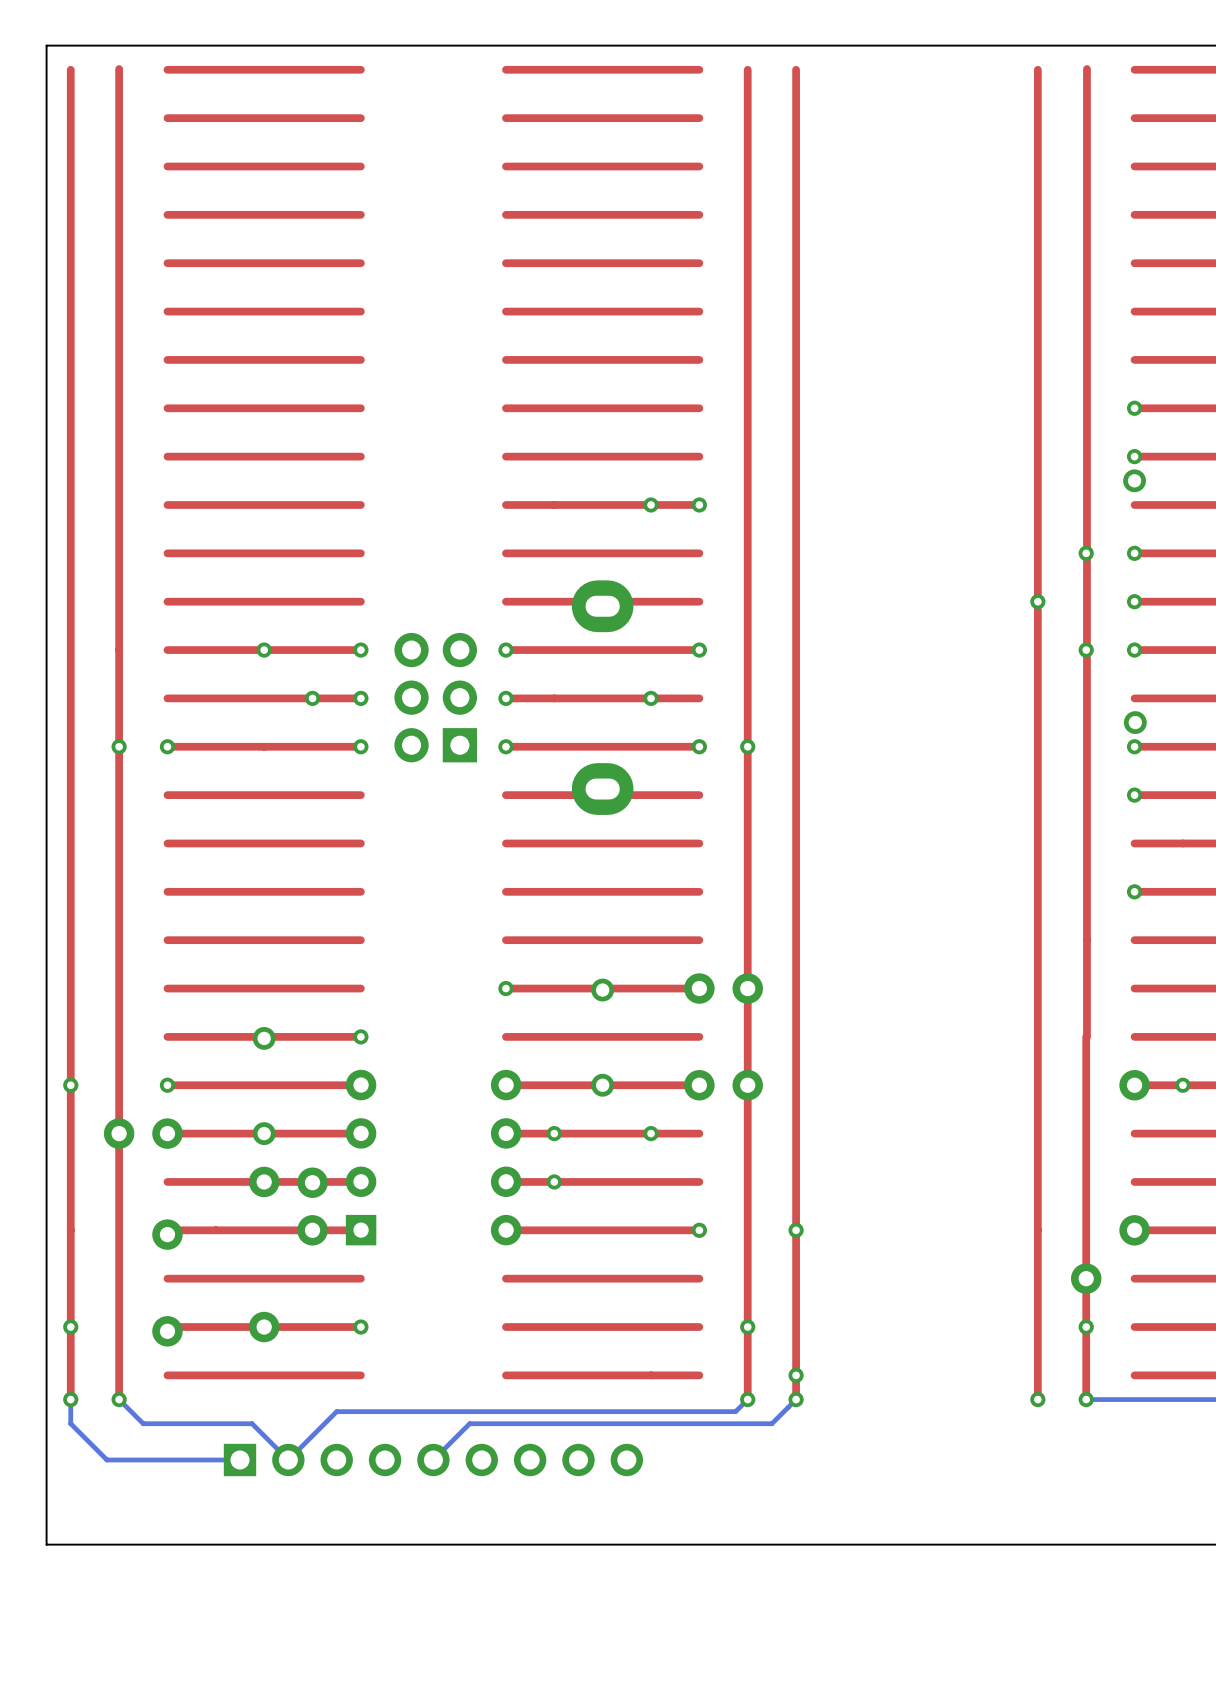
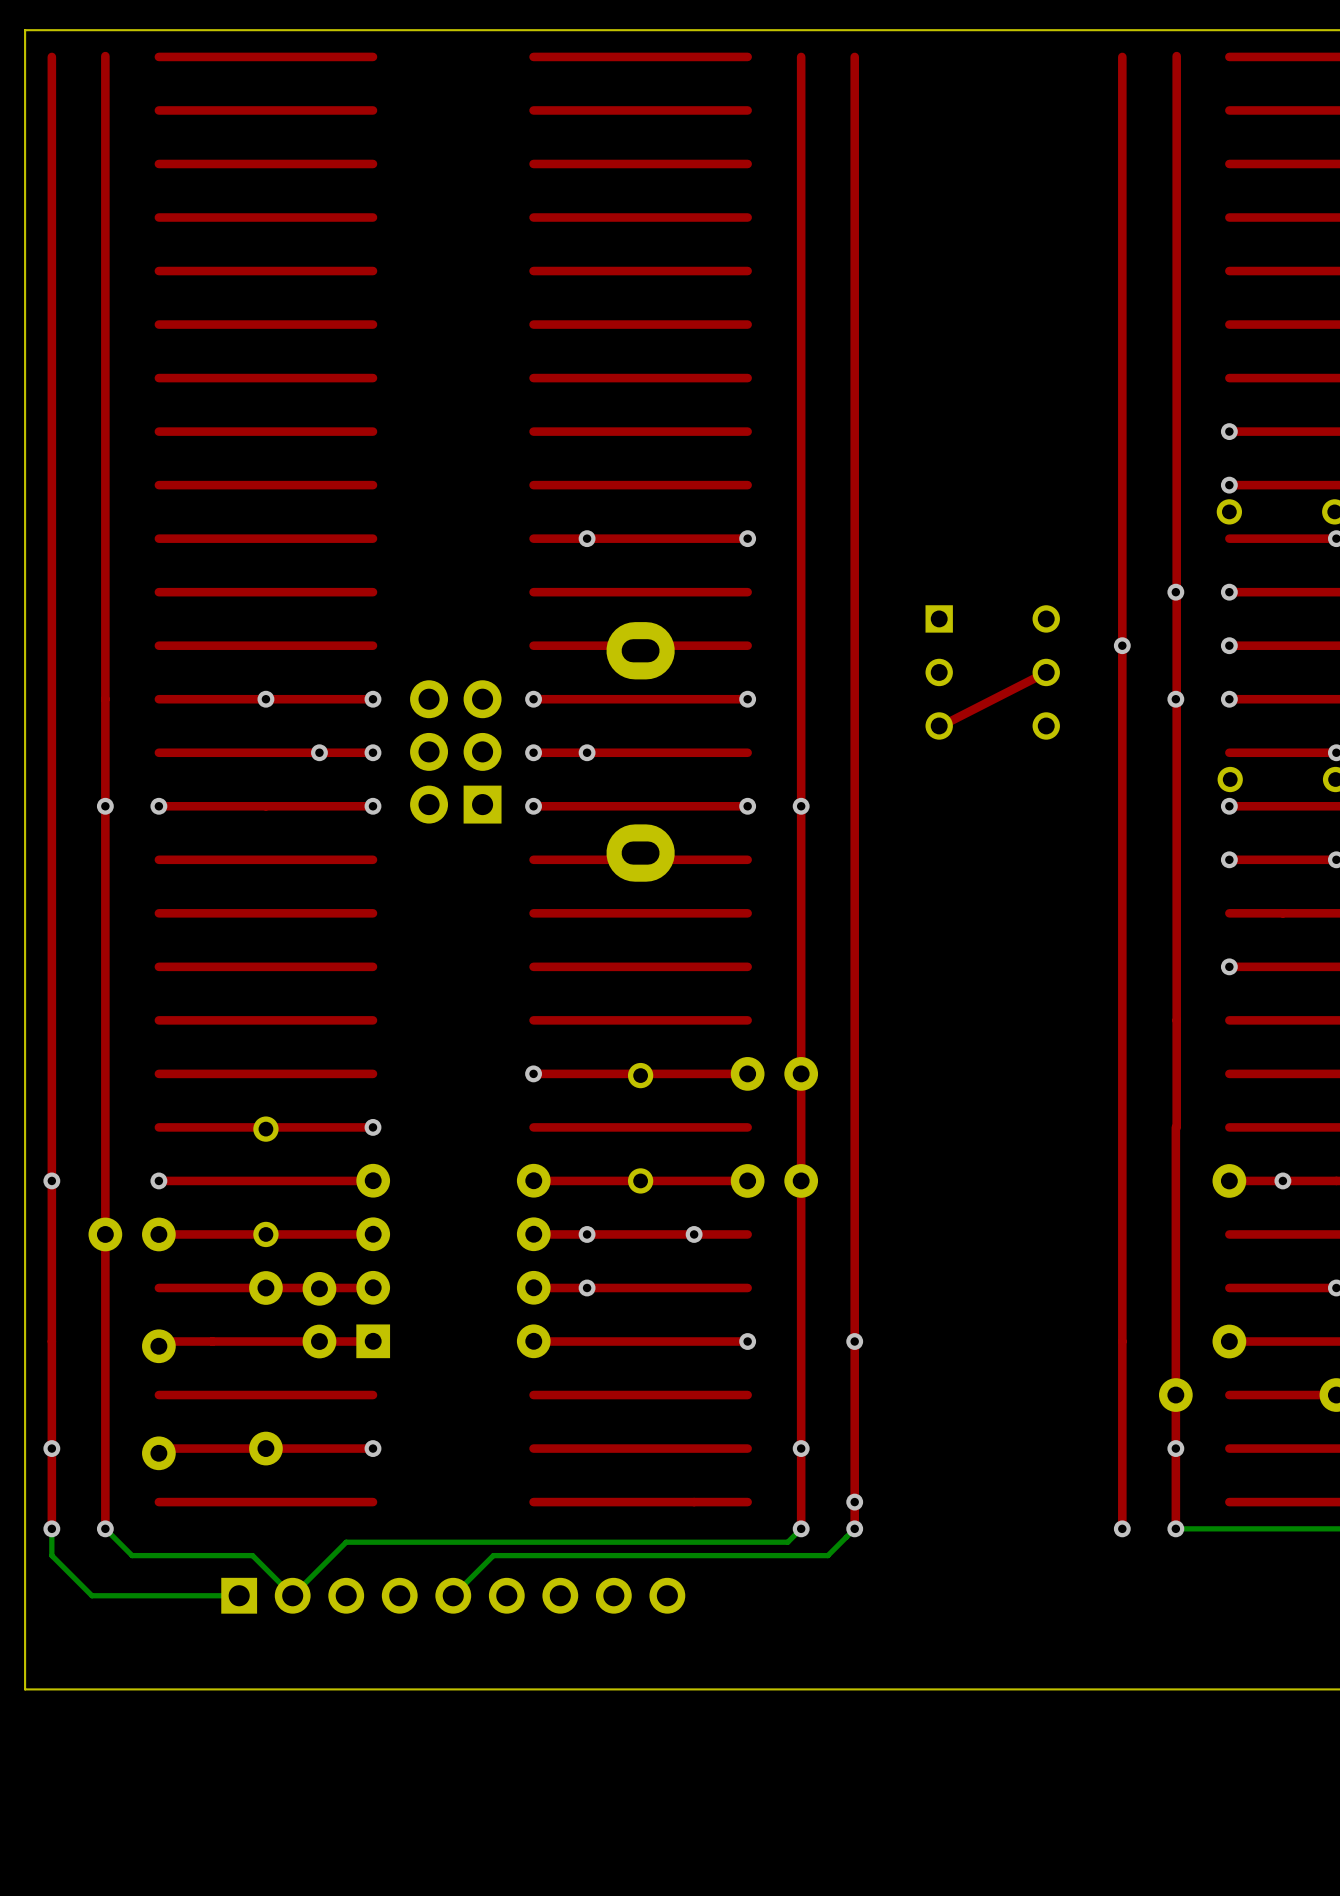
via position: (651, 504) -> (587, 538)
part: none -> (992, 672)
via position: (651, 698) -> (587, 752)

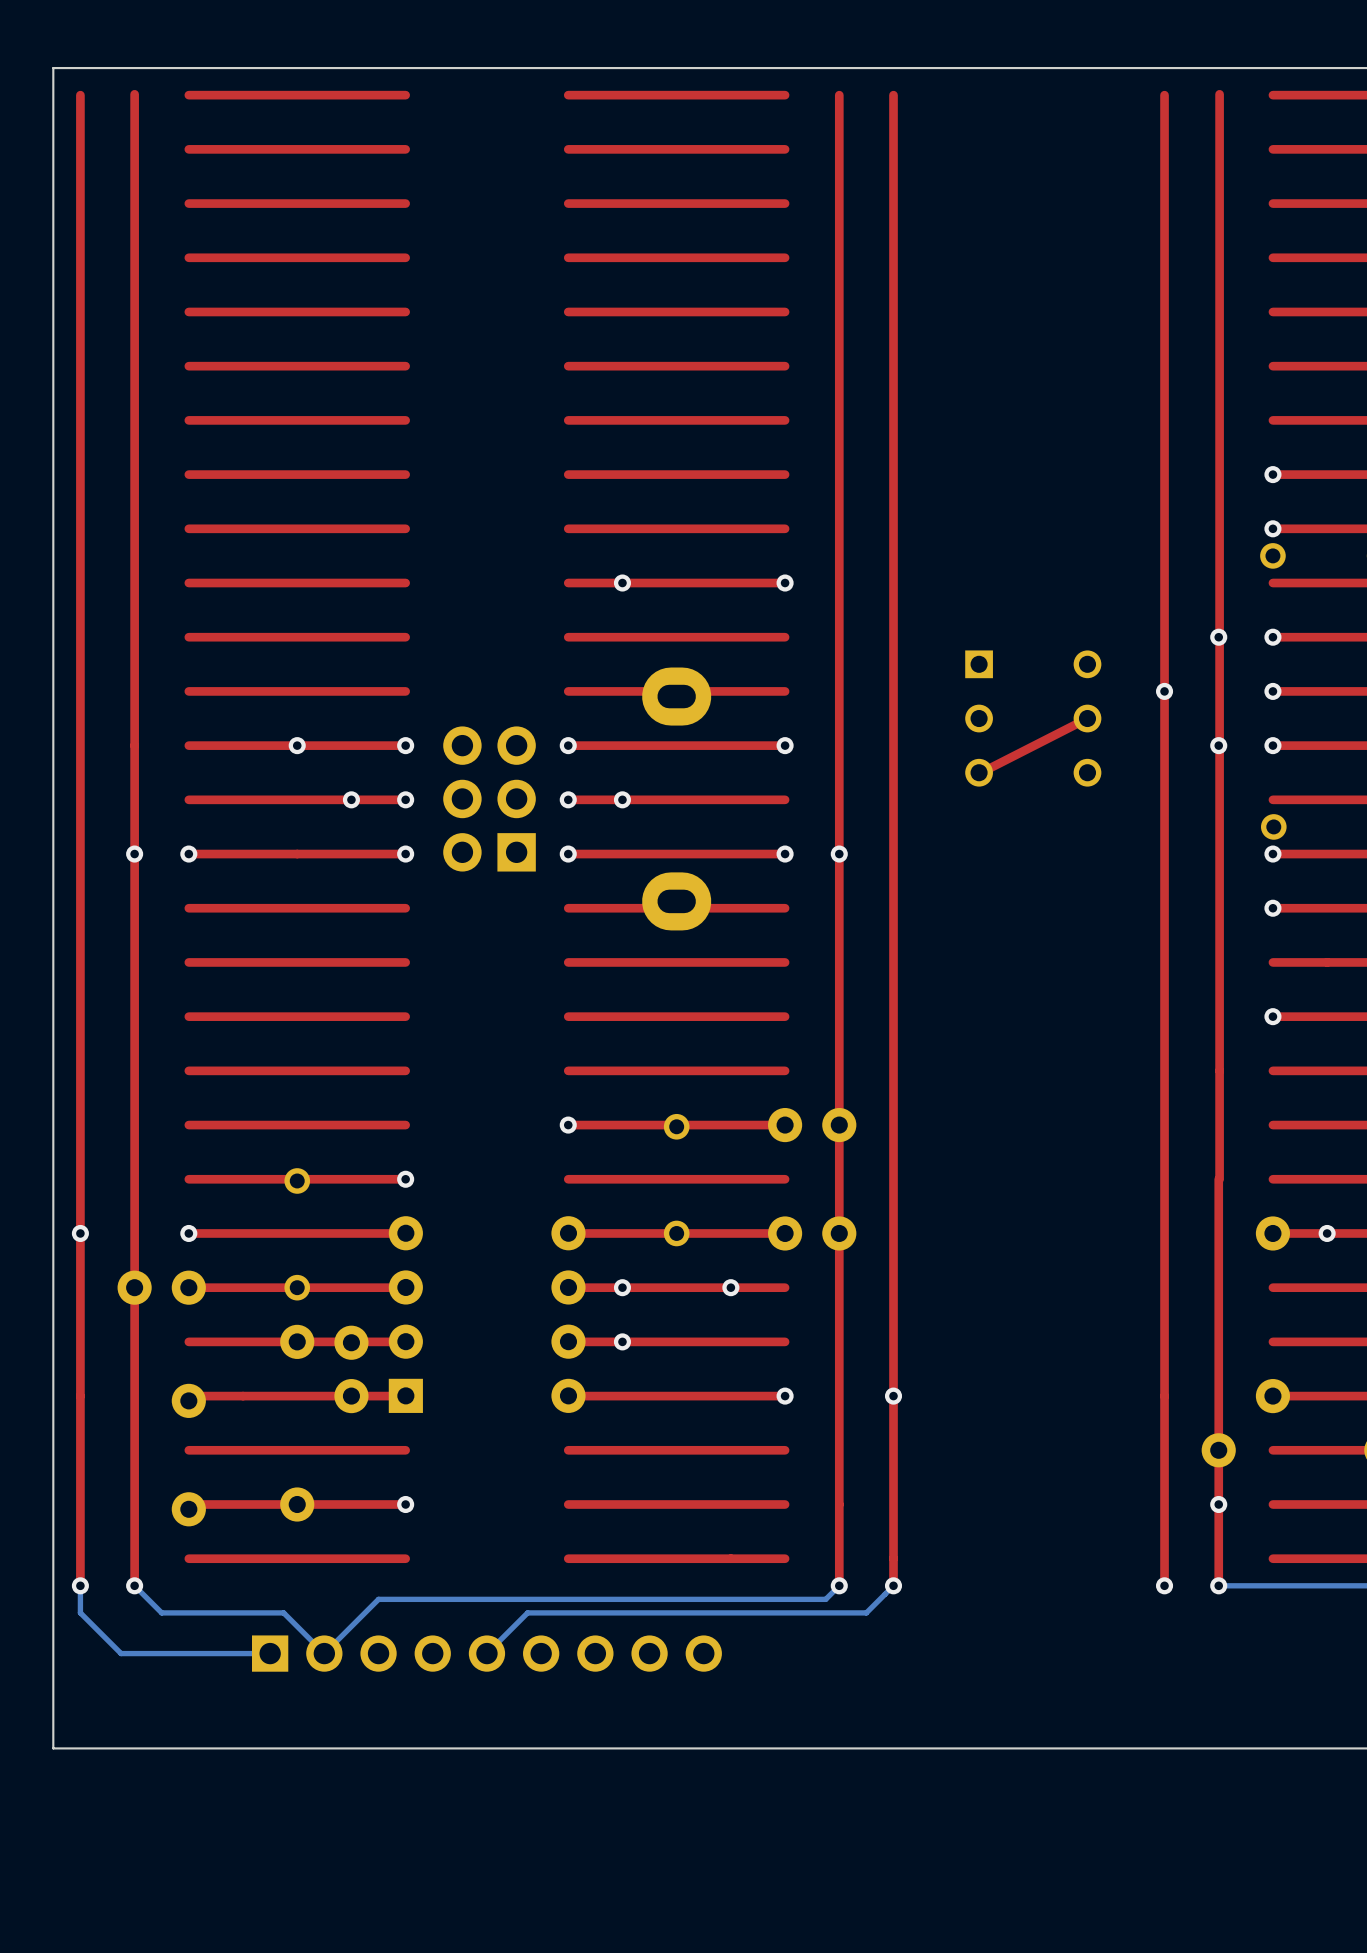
via: (51, 1448) -> none
via: (801, 1448) -> none
via: (854, 1502) -> none

